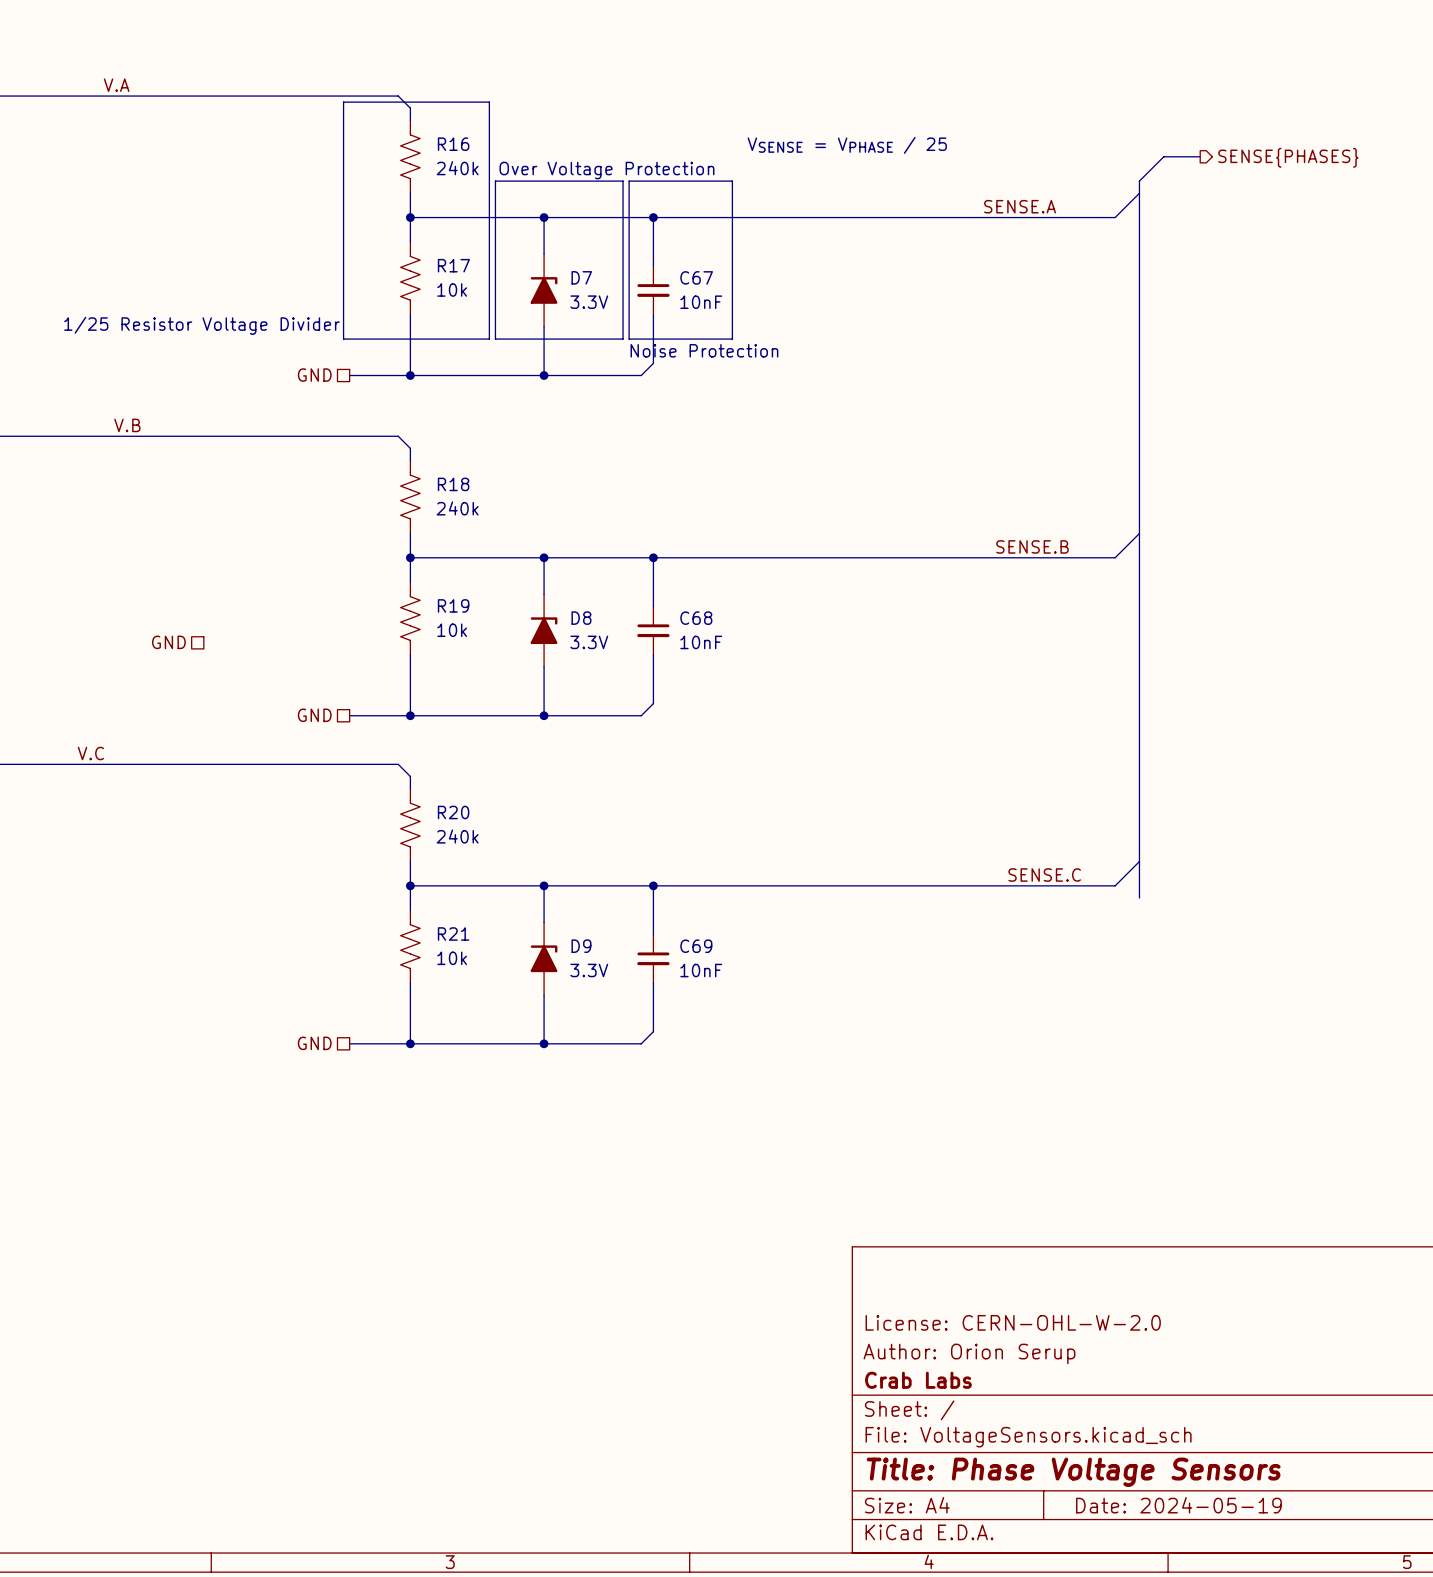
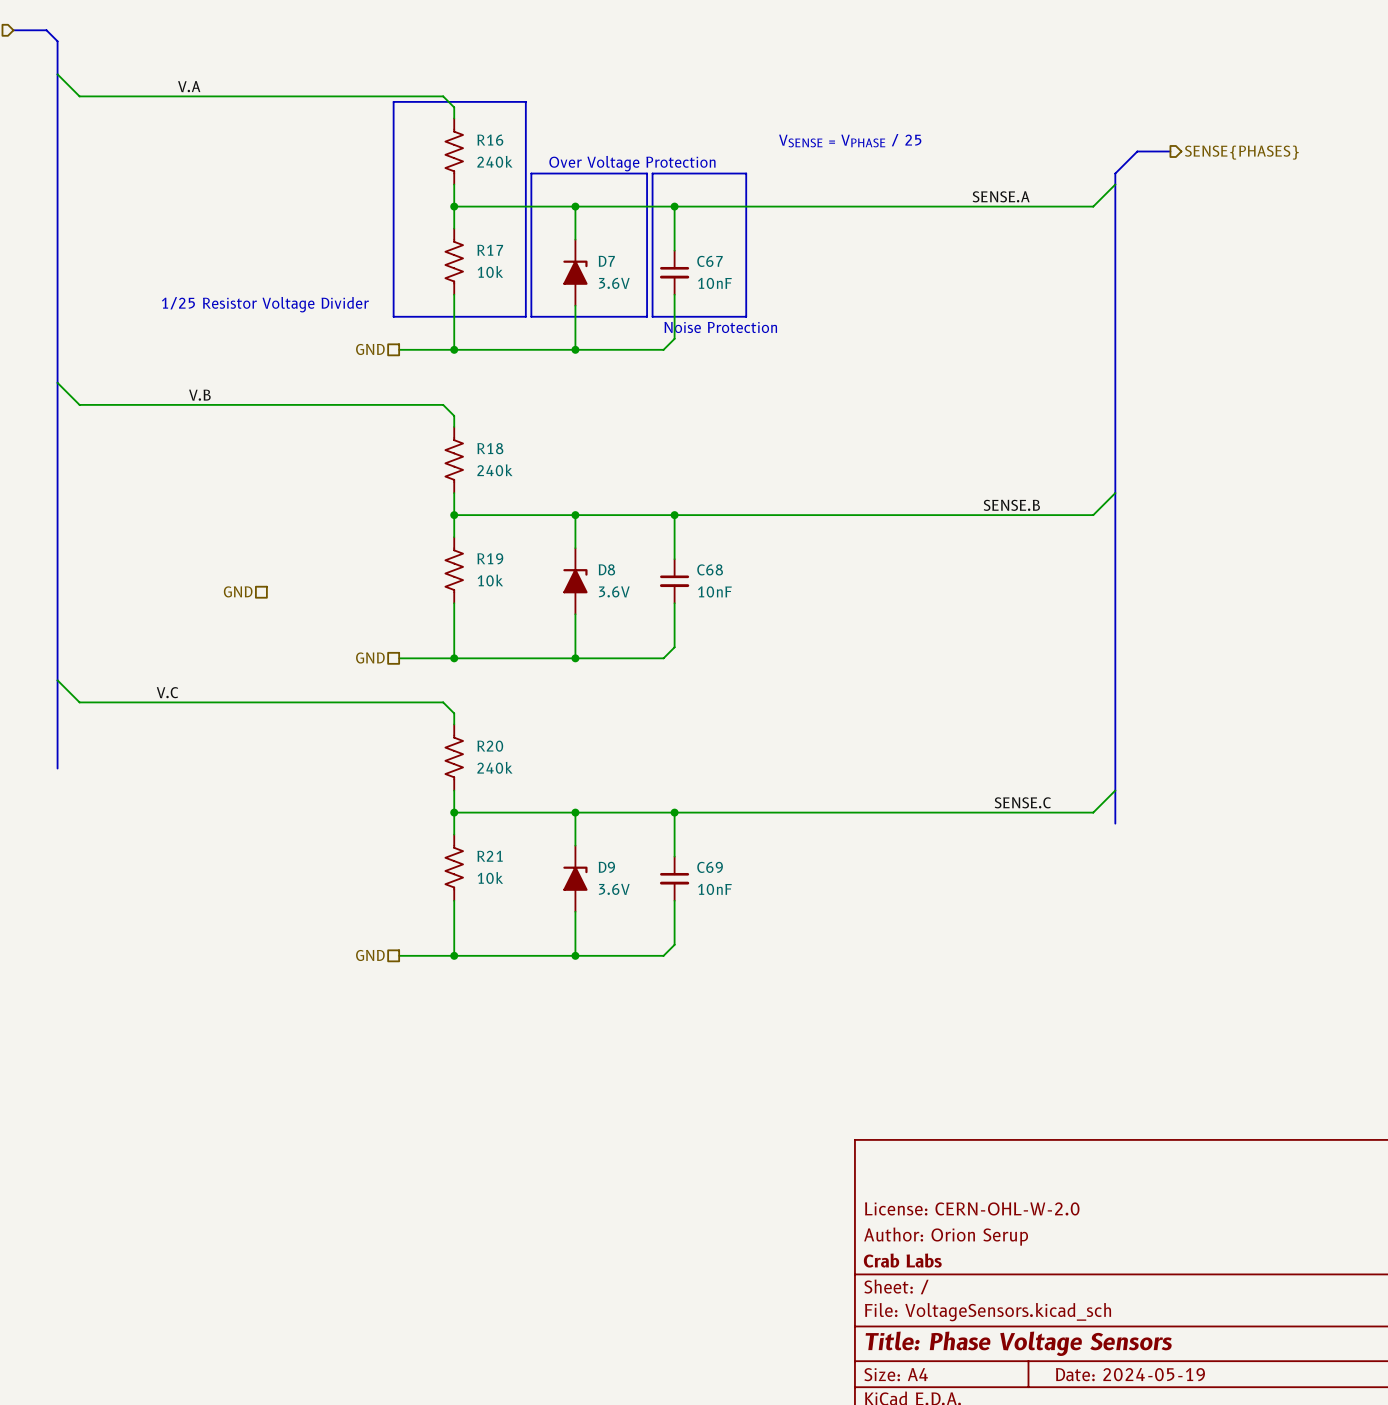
D7 value: 3.3V (589, 302) -> 3.6V (614, 283)
D8 value: 3.3V (589, 642) -> 3.6V (614, 591)
D9 value: 3.3V (589, 970) -> 3.6V (614, 889)

